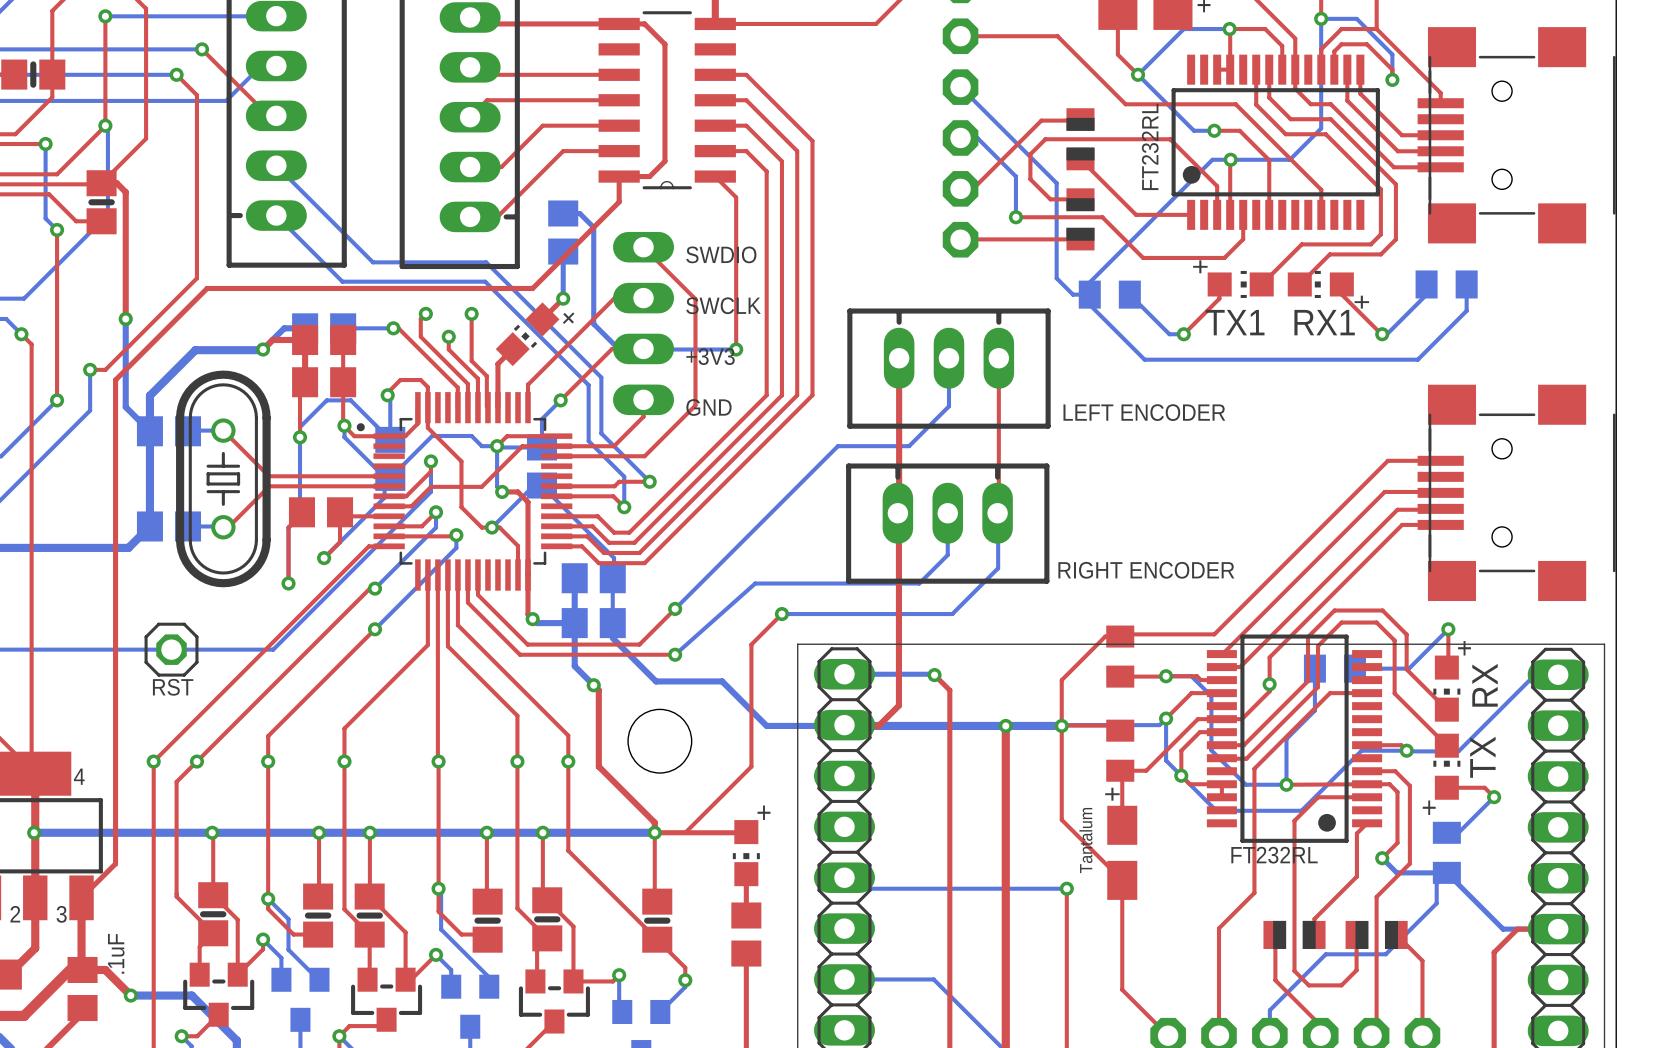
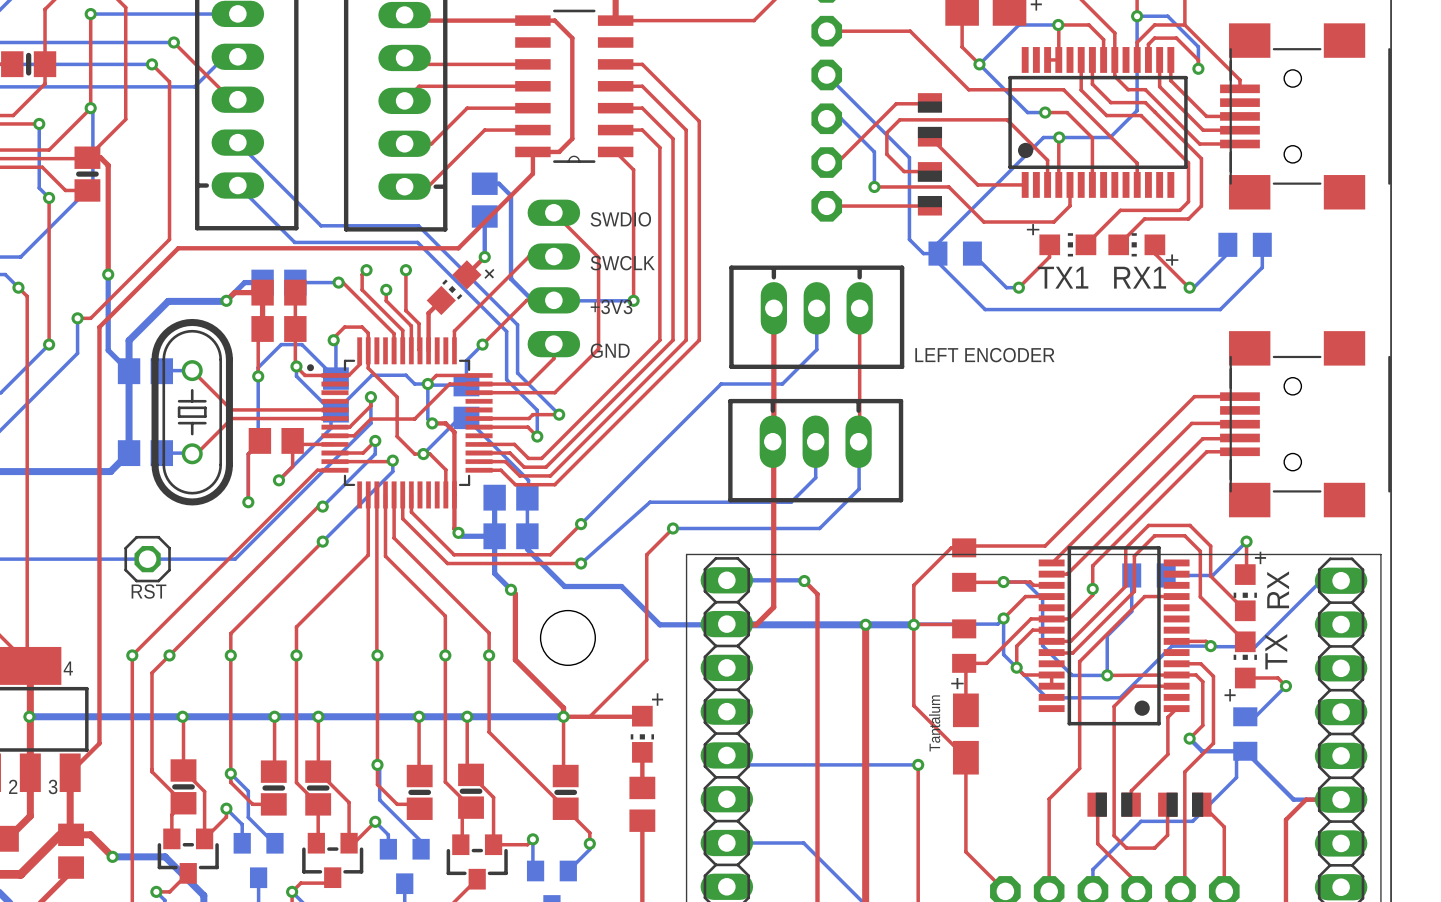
text: FT232RL (1150, 146) -> none
text: RIGHT ENCODER (1146, 570) -> none
text: FT232RL (1274, 855) -> none
part value: .1uF (116, 953) -> none

